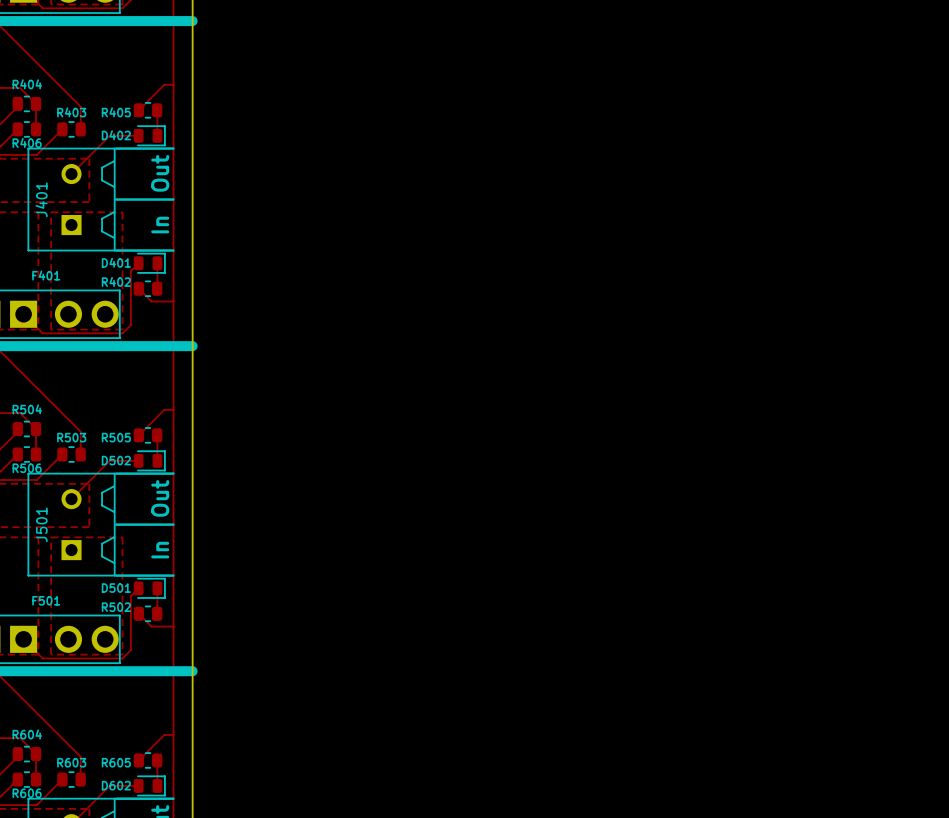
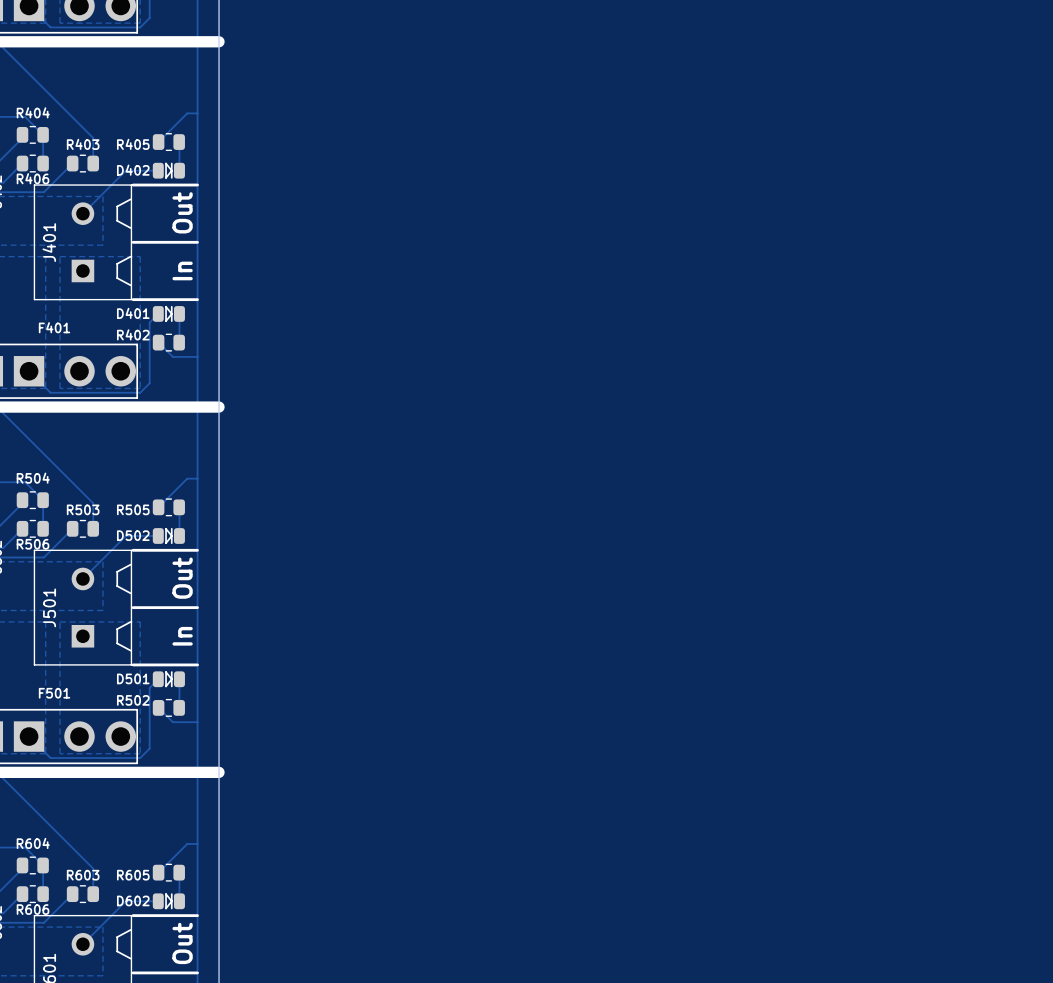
D402 footprint: [133, 125, 166, 147] -> [152, 162, 185, 179]
D401 footprint: [133, 253, 166, 274] -> [152, 305, 185, 322]
D502 footprint: [133, 450, 166, 472] -> [152, 527, 185, 545]
D501 footprint: [133, 578, 166, 599] -> [152, 671, 185, 688]
D602 footprint: [133, 775, 166, 797] -> [152, 893, 185, 910]

